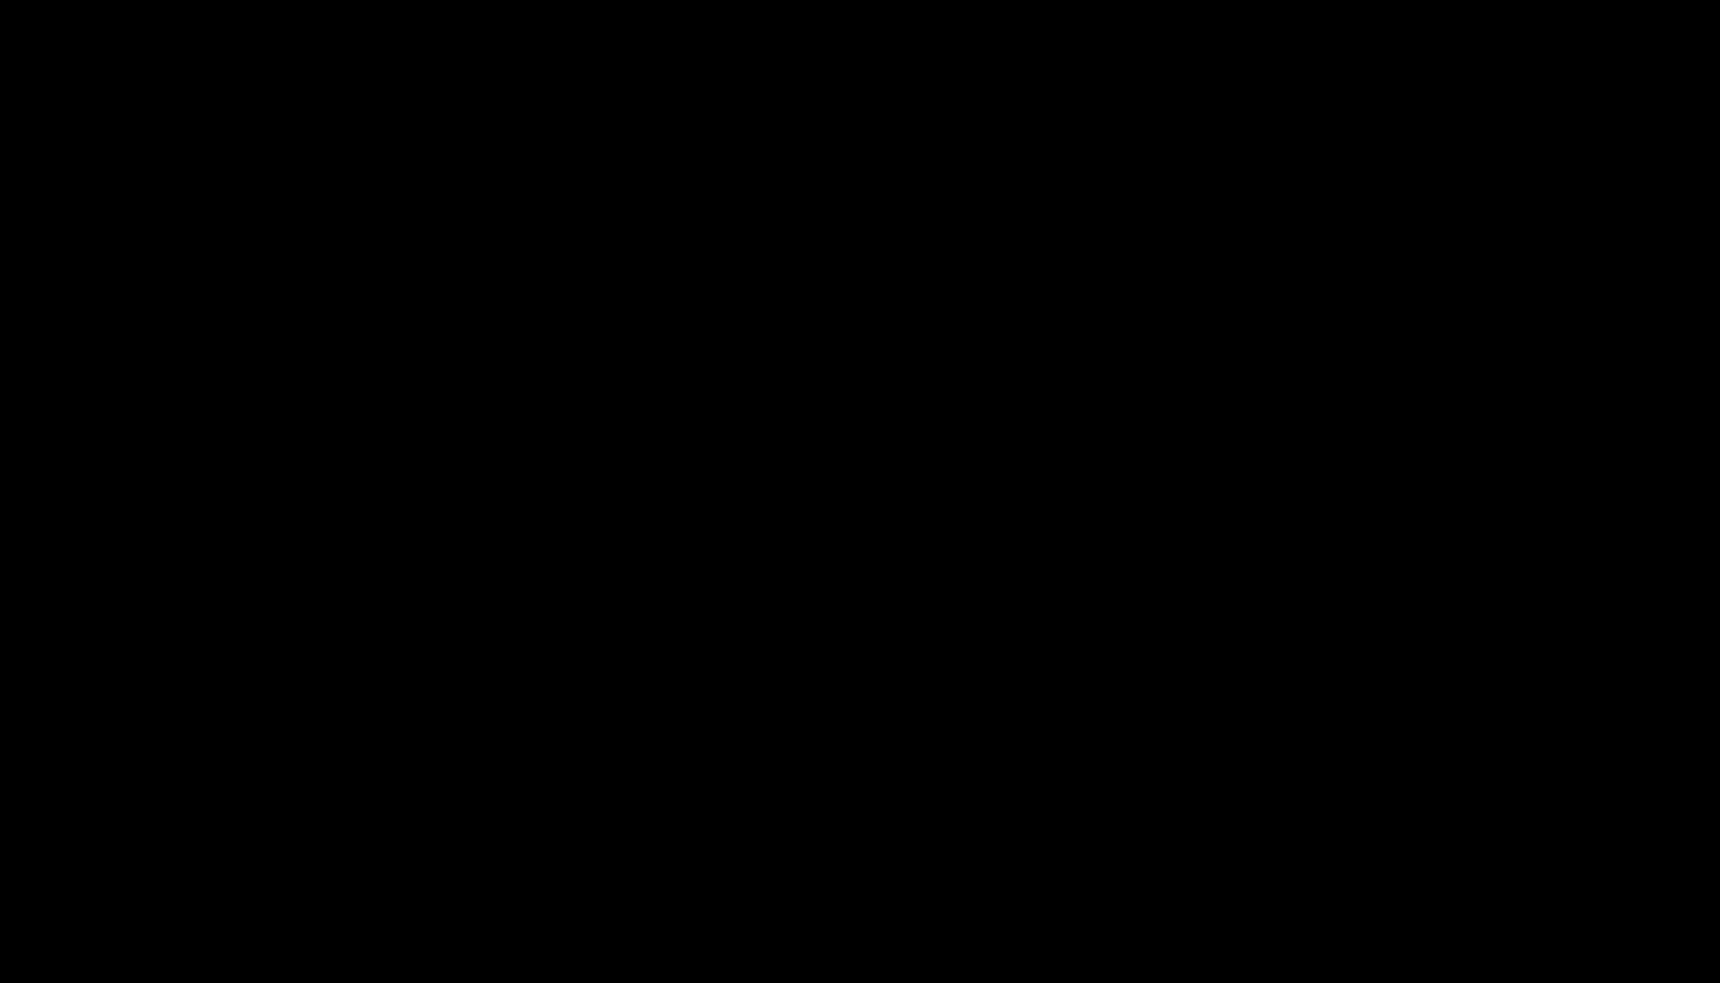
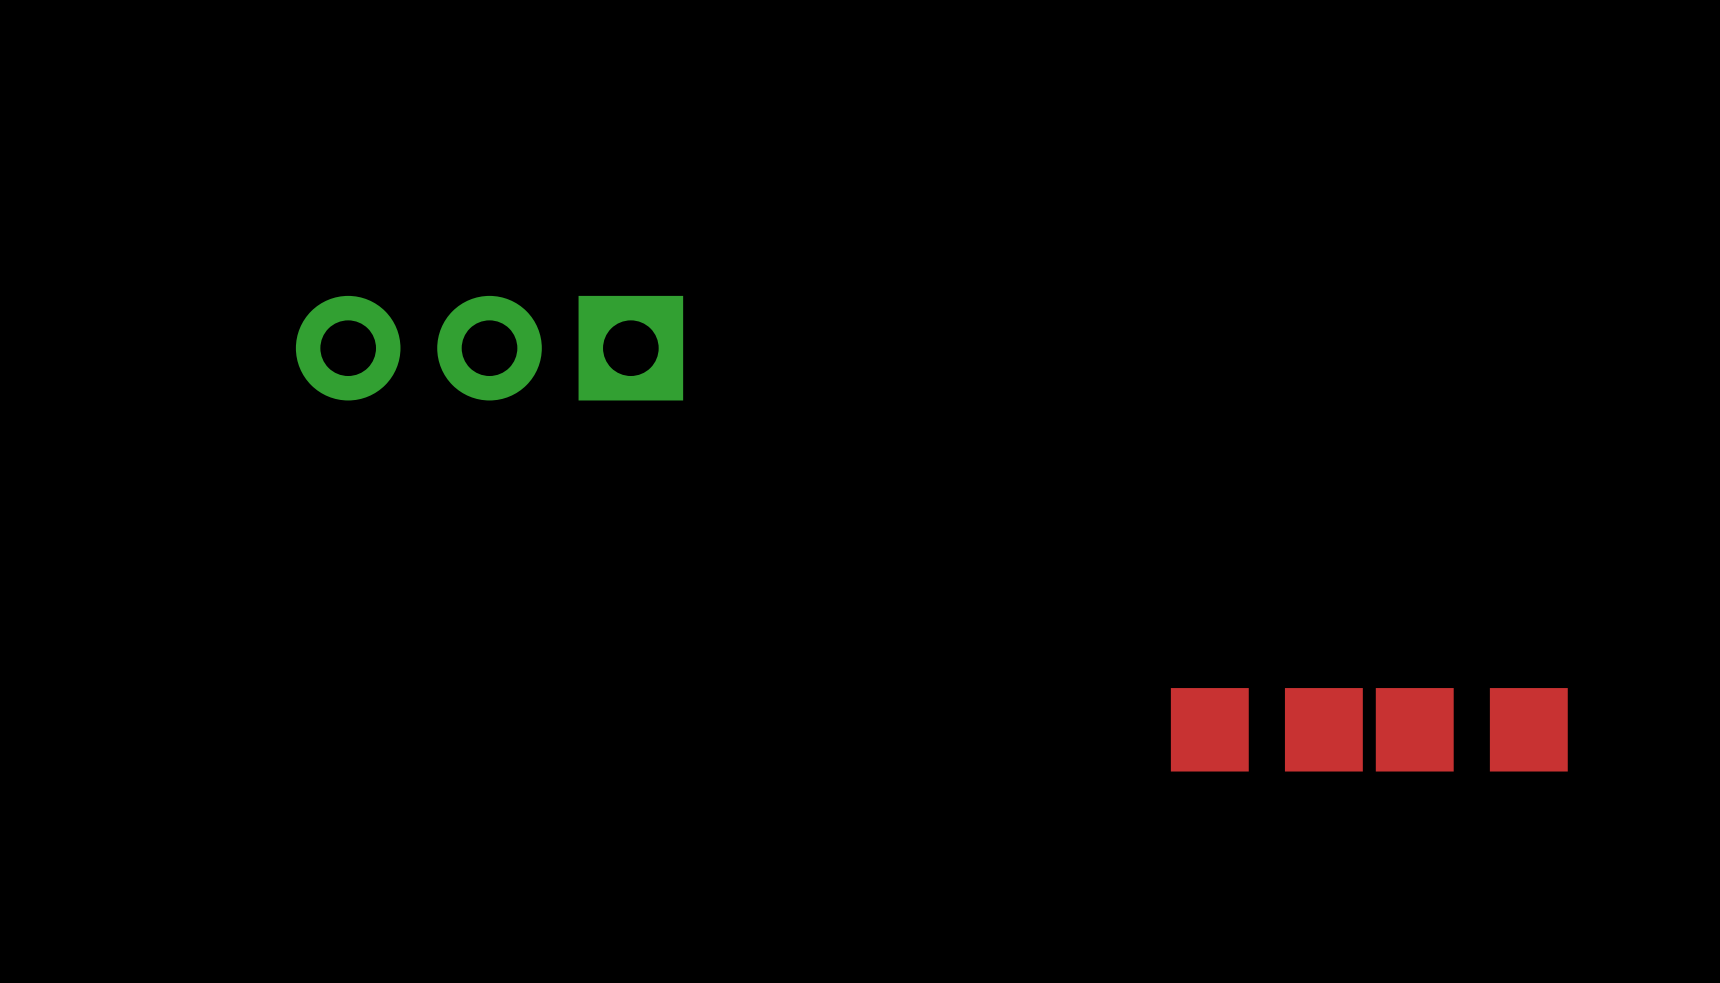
part: none -> (489, 348)
part: none -> (1266, 729)
part: none -> (1471, 729)

